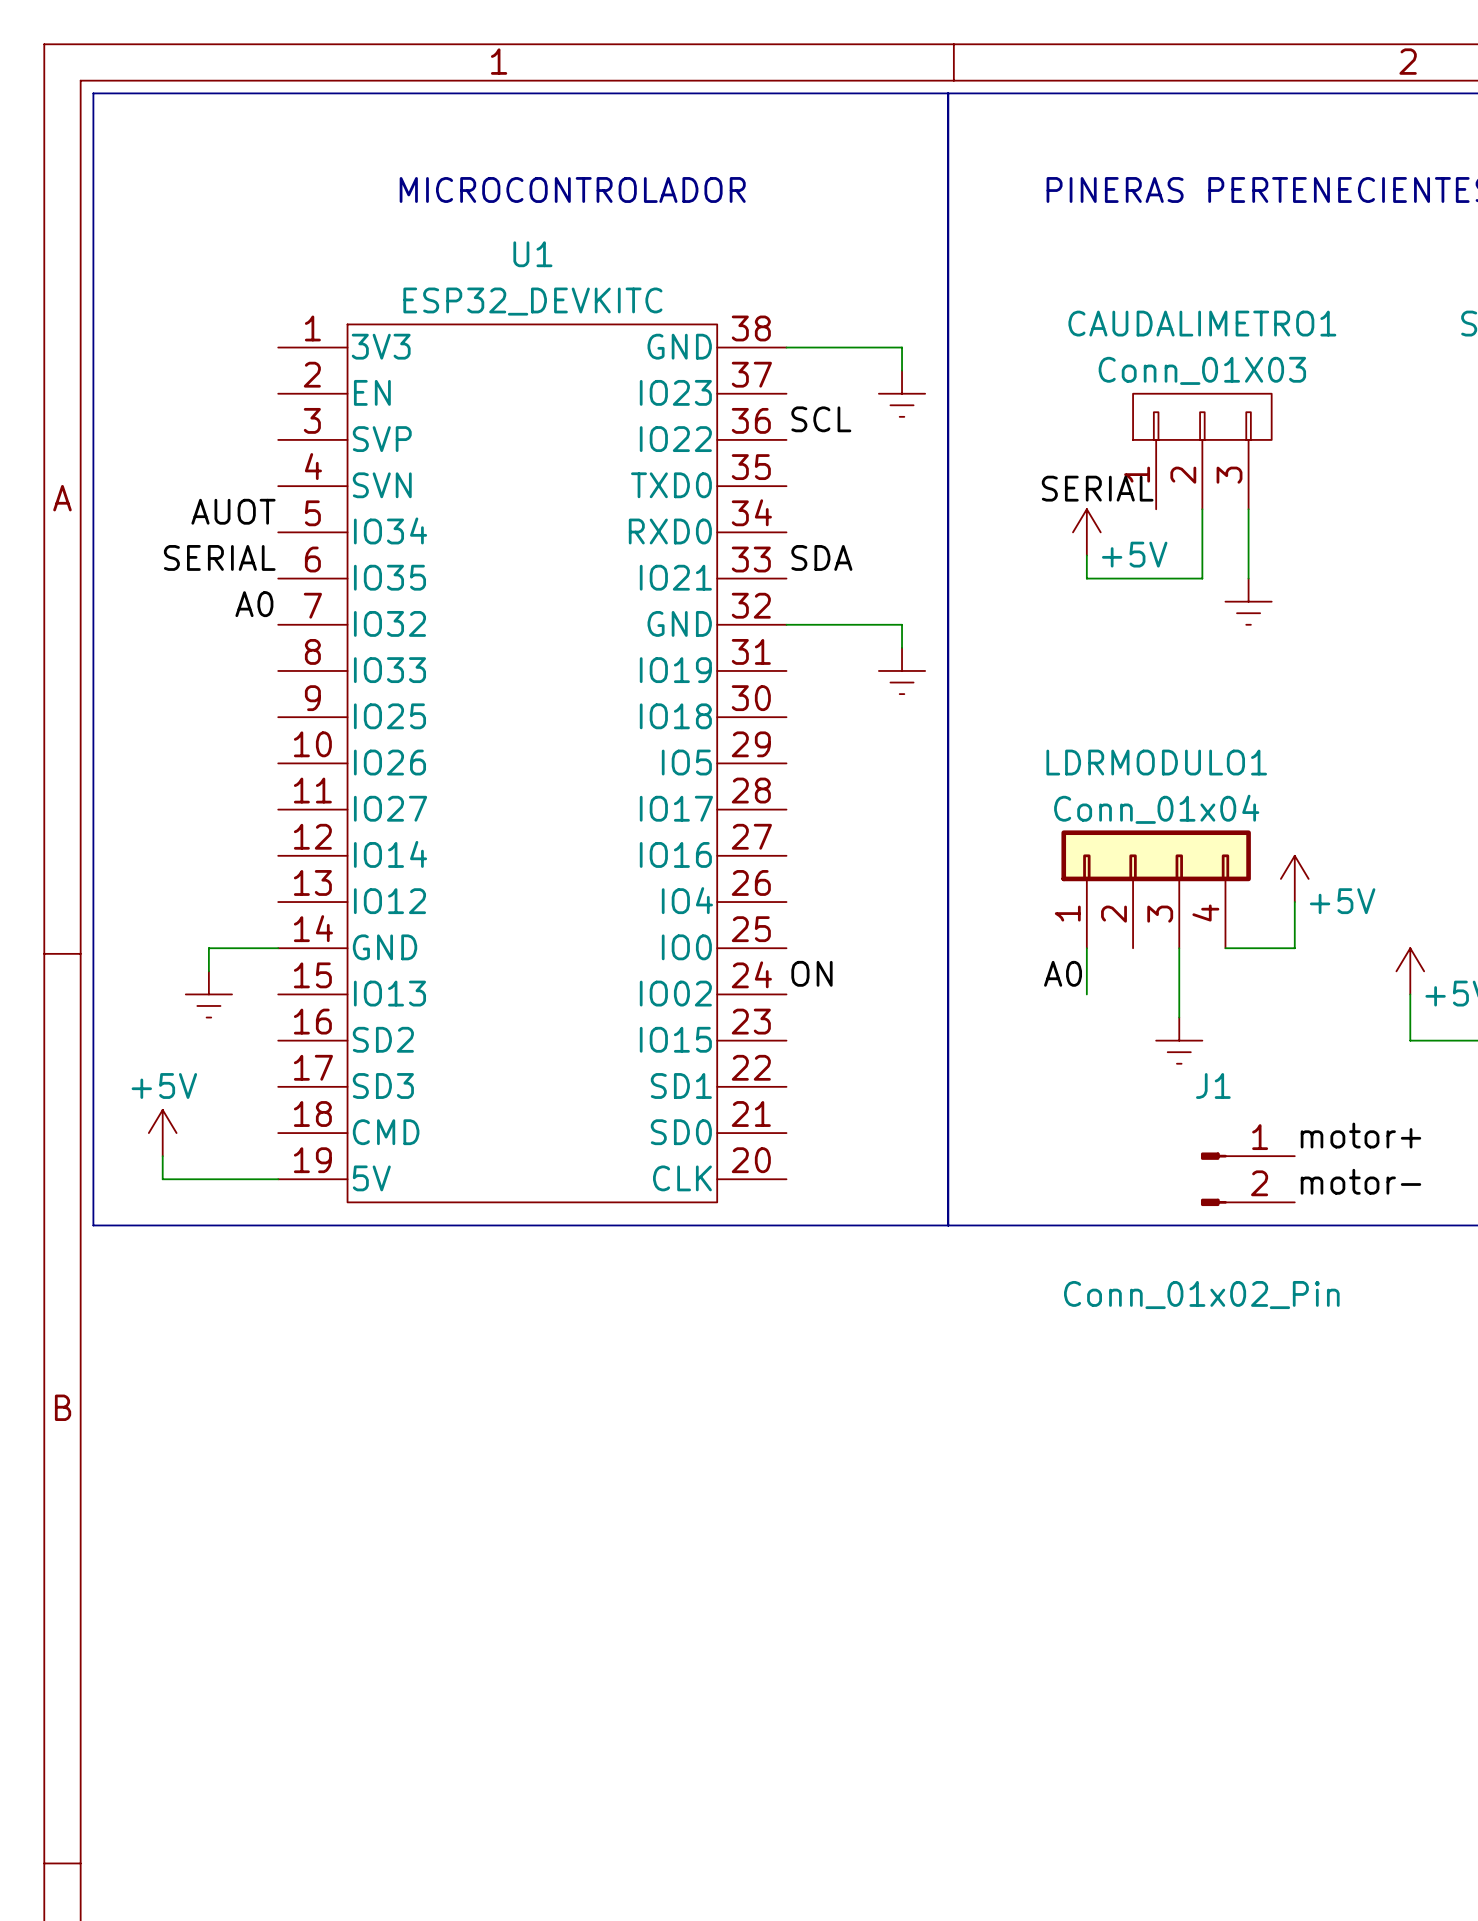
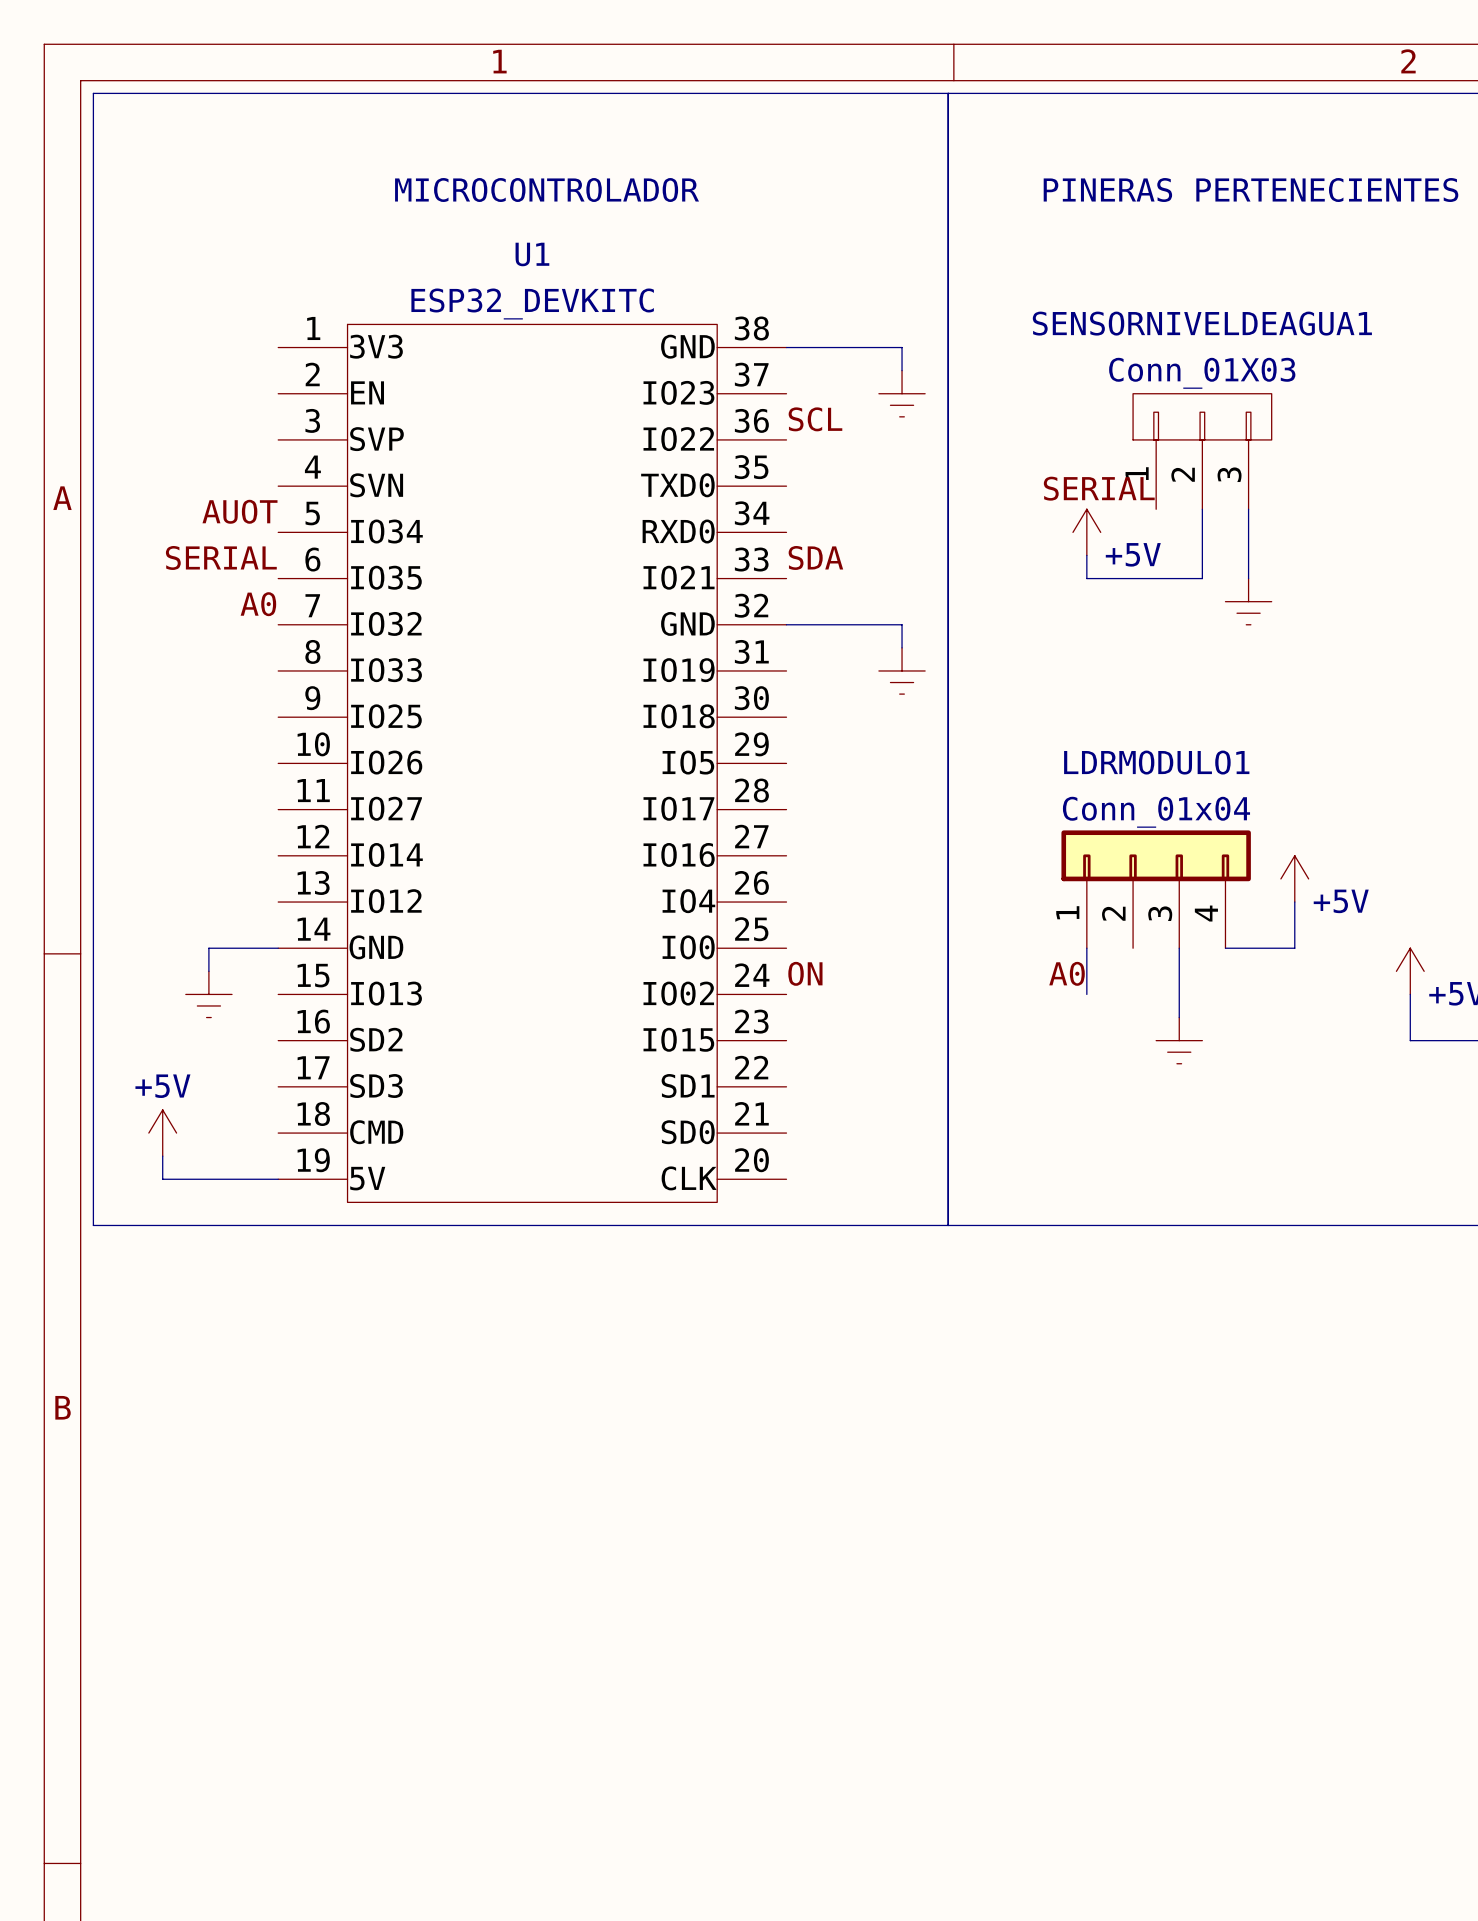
CAUDALIMETRO1 name: CAUDALIMETRO1 (1202, 323) -> SENSORNIVELDEAGUA1 (1202, 323)
label: motor+ (1360, 1135) -> none
J1: Conn_01x02_Pin (1247, 1179) -> none
label: motor- (1360, 1181) -> none

